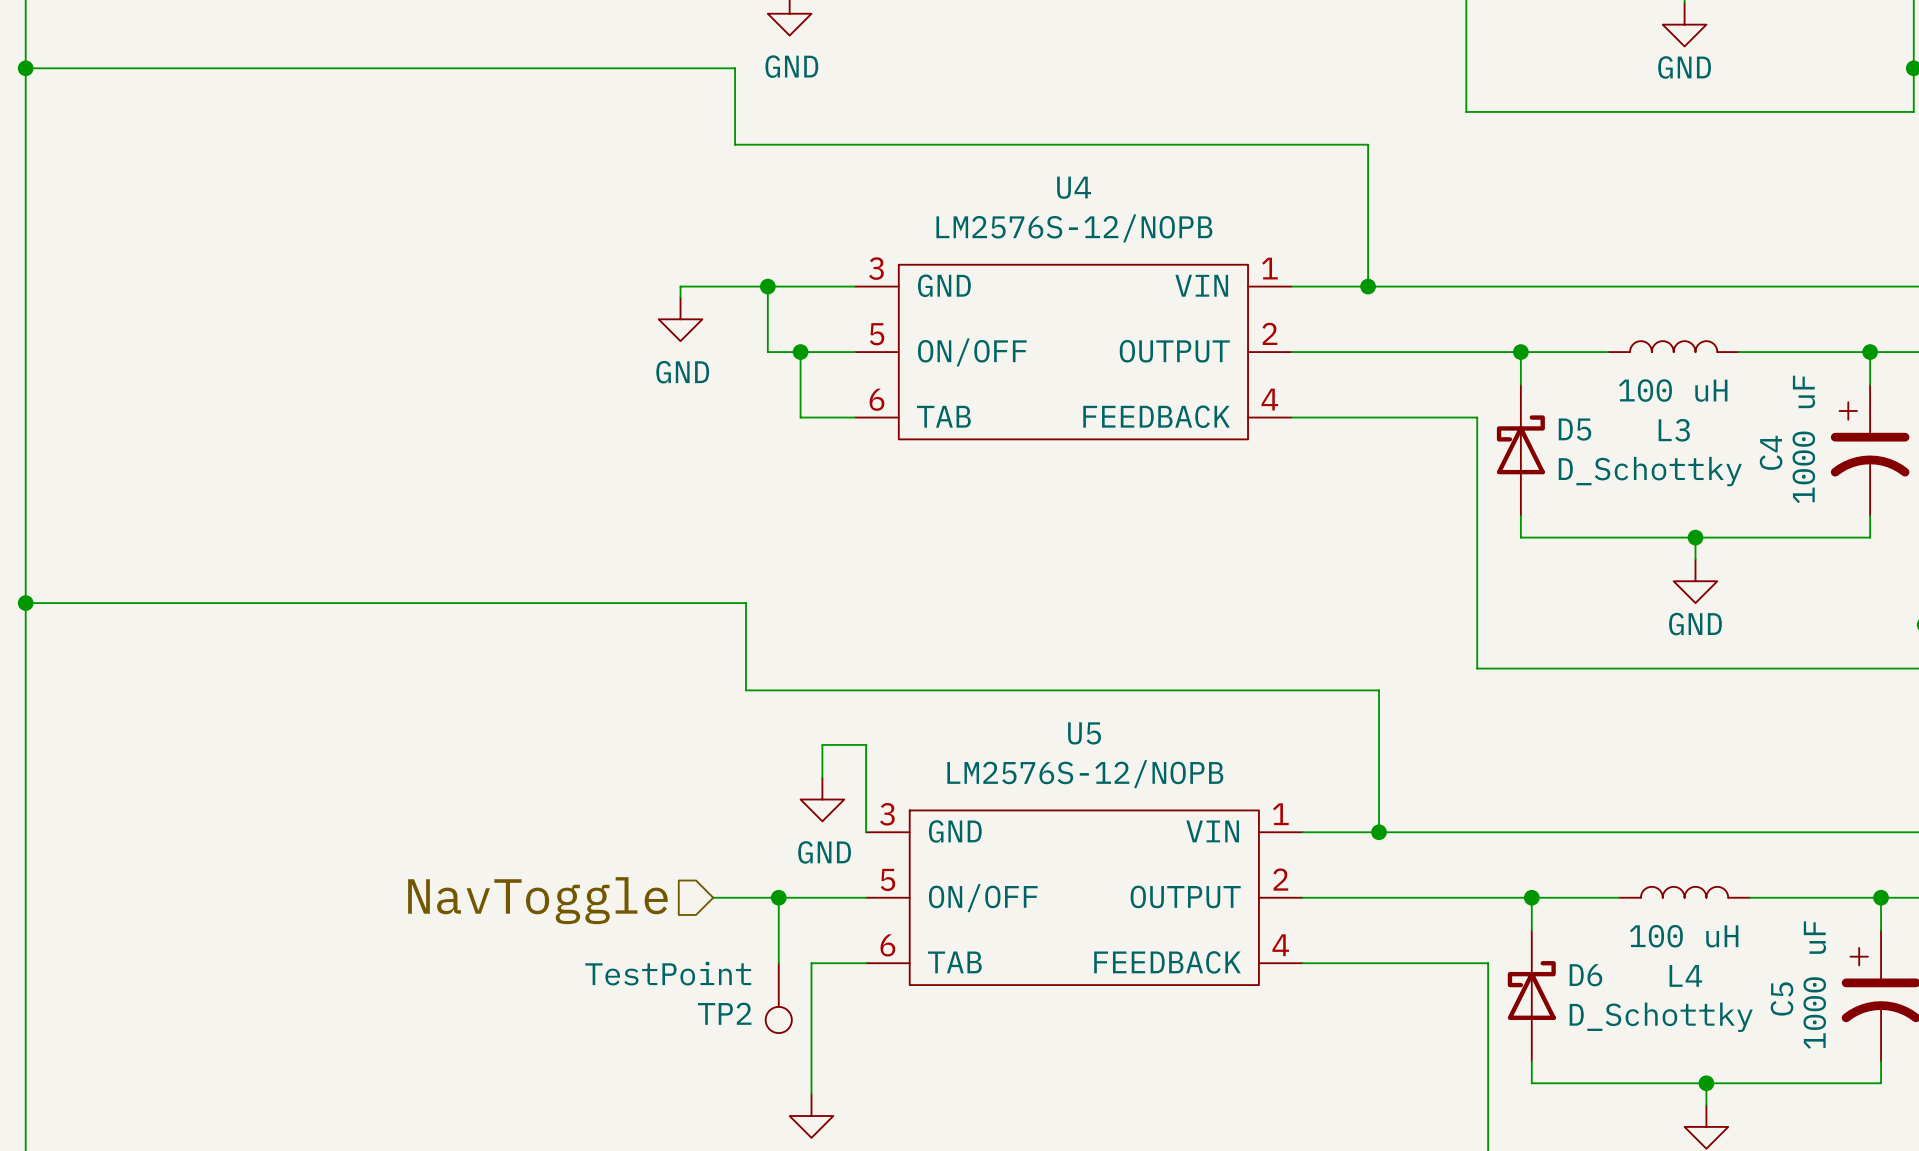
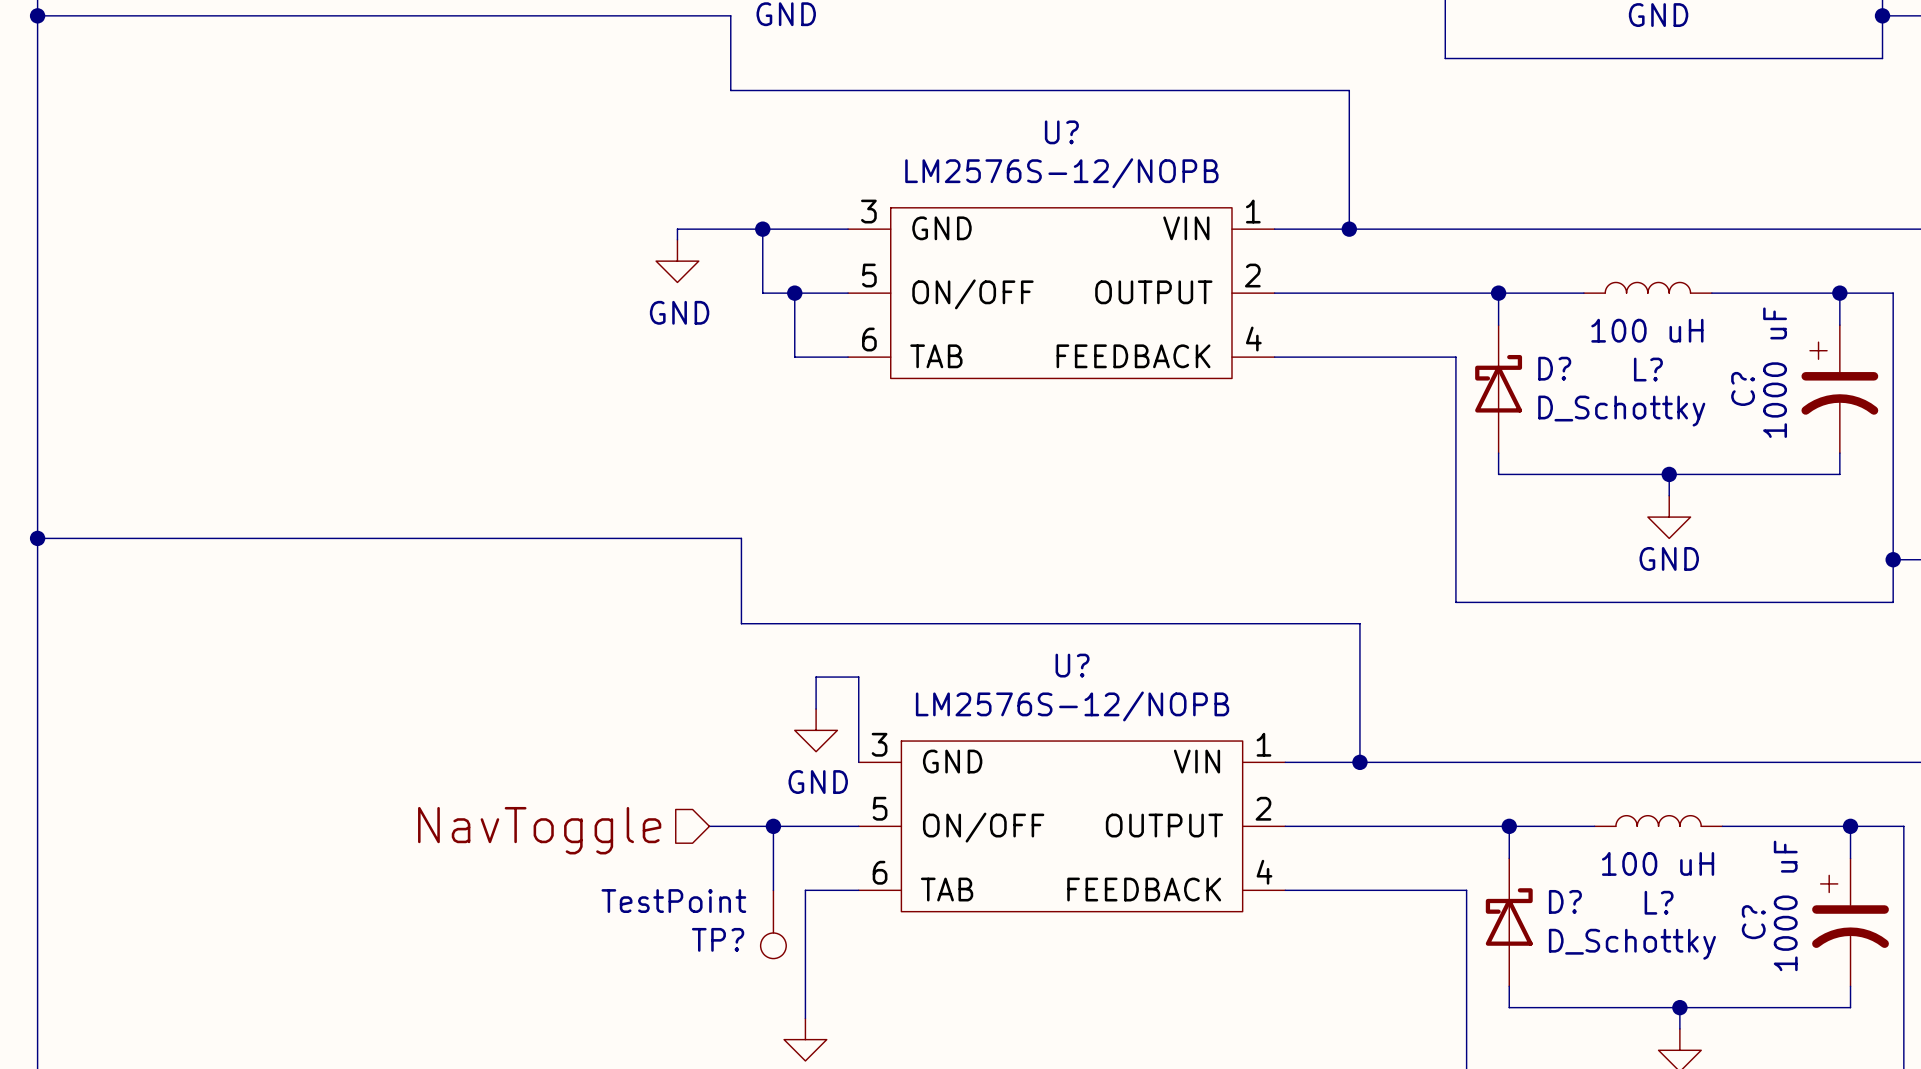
U4 name: U4 (1074, 187) -> U? (1061, 132)
D5 name: D5 (1575, 429) -> D? (1554, 368)
L3 name: L3 (1674, 430) -> L? (1648, 369)
C4 name: C4 (1771, 452) -> C? (1743, 388)
U5 name: U5 (1084, 733) -> U? (1072, 665)
D6 name: D6 (1585, 975) -> D? (1565, 901)
L4 name: L4 (1685, 975) -> L? (1659, 902)
C5 name: C5 (1781, 998) -> C? (1753, 922)
TP2 name: TP2 (724, 1013) -> TP? (718, 939)

